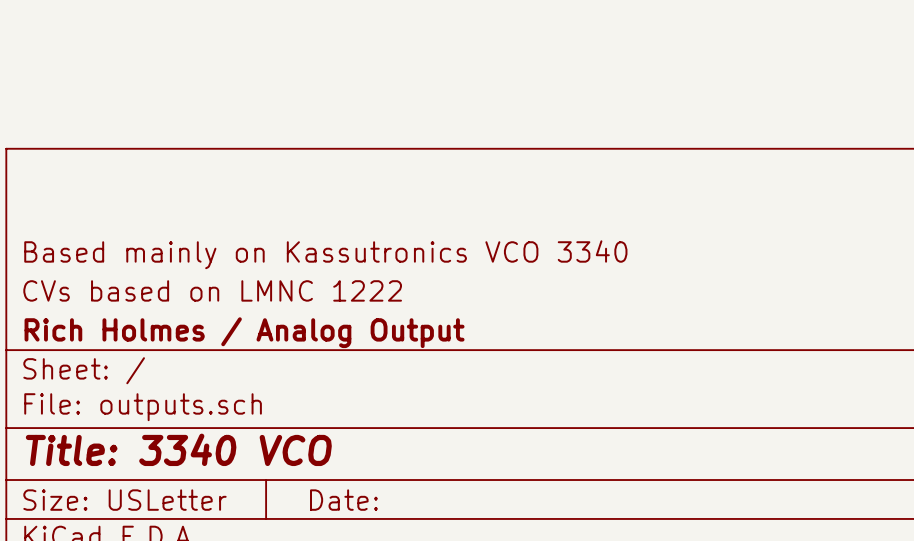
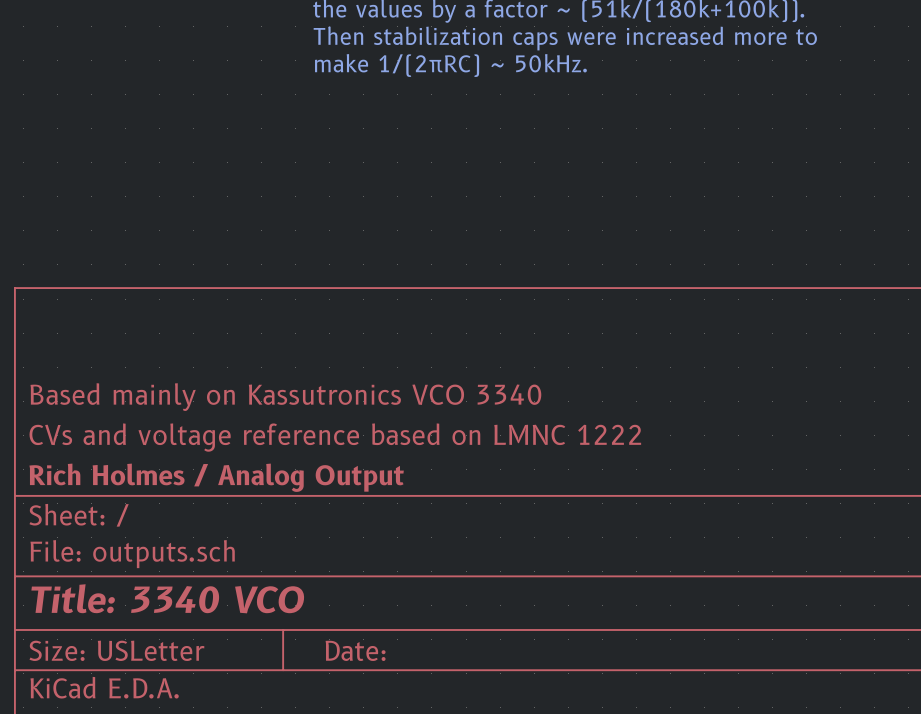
title block: CVs based on LMNC 1222 (212, 290) -> CVs and voltage reference based on LMNC 1222 (335, 437)

